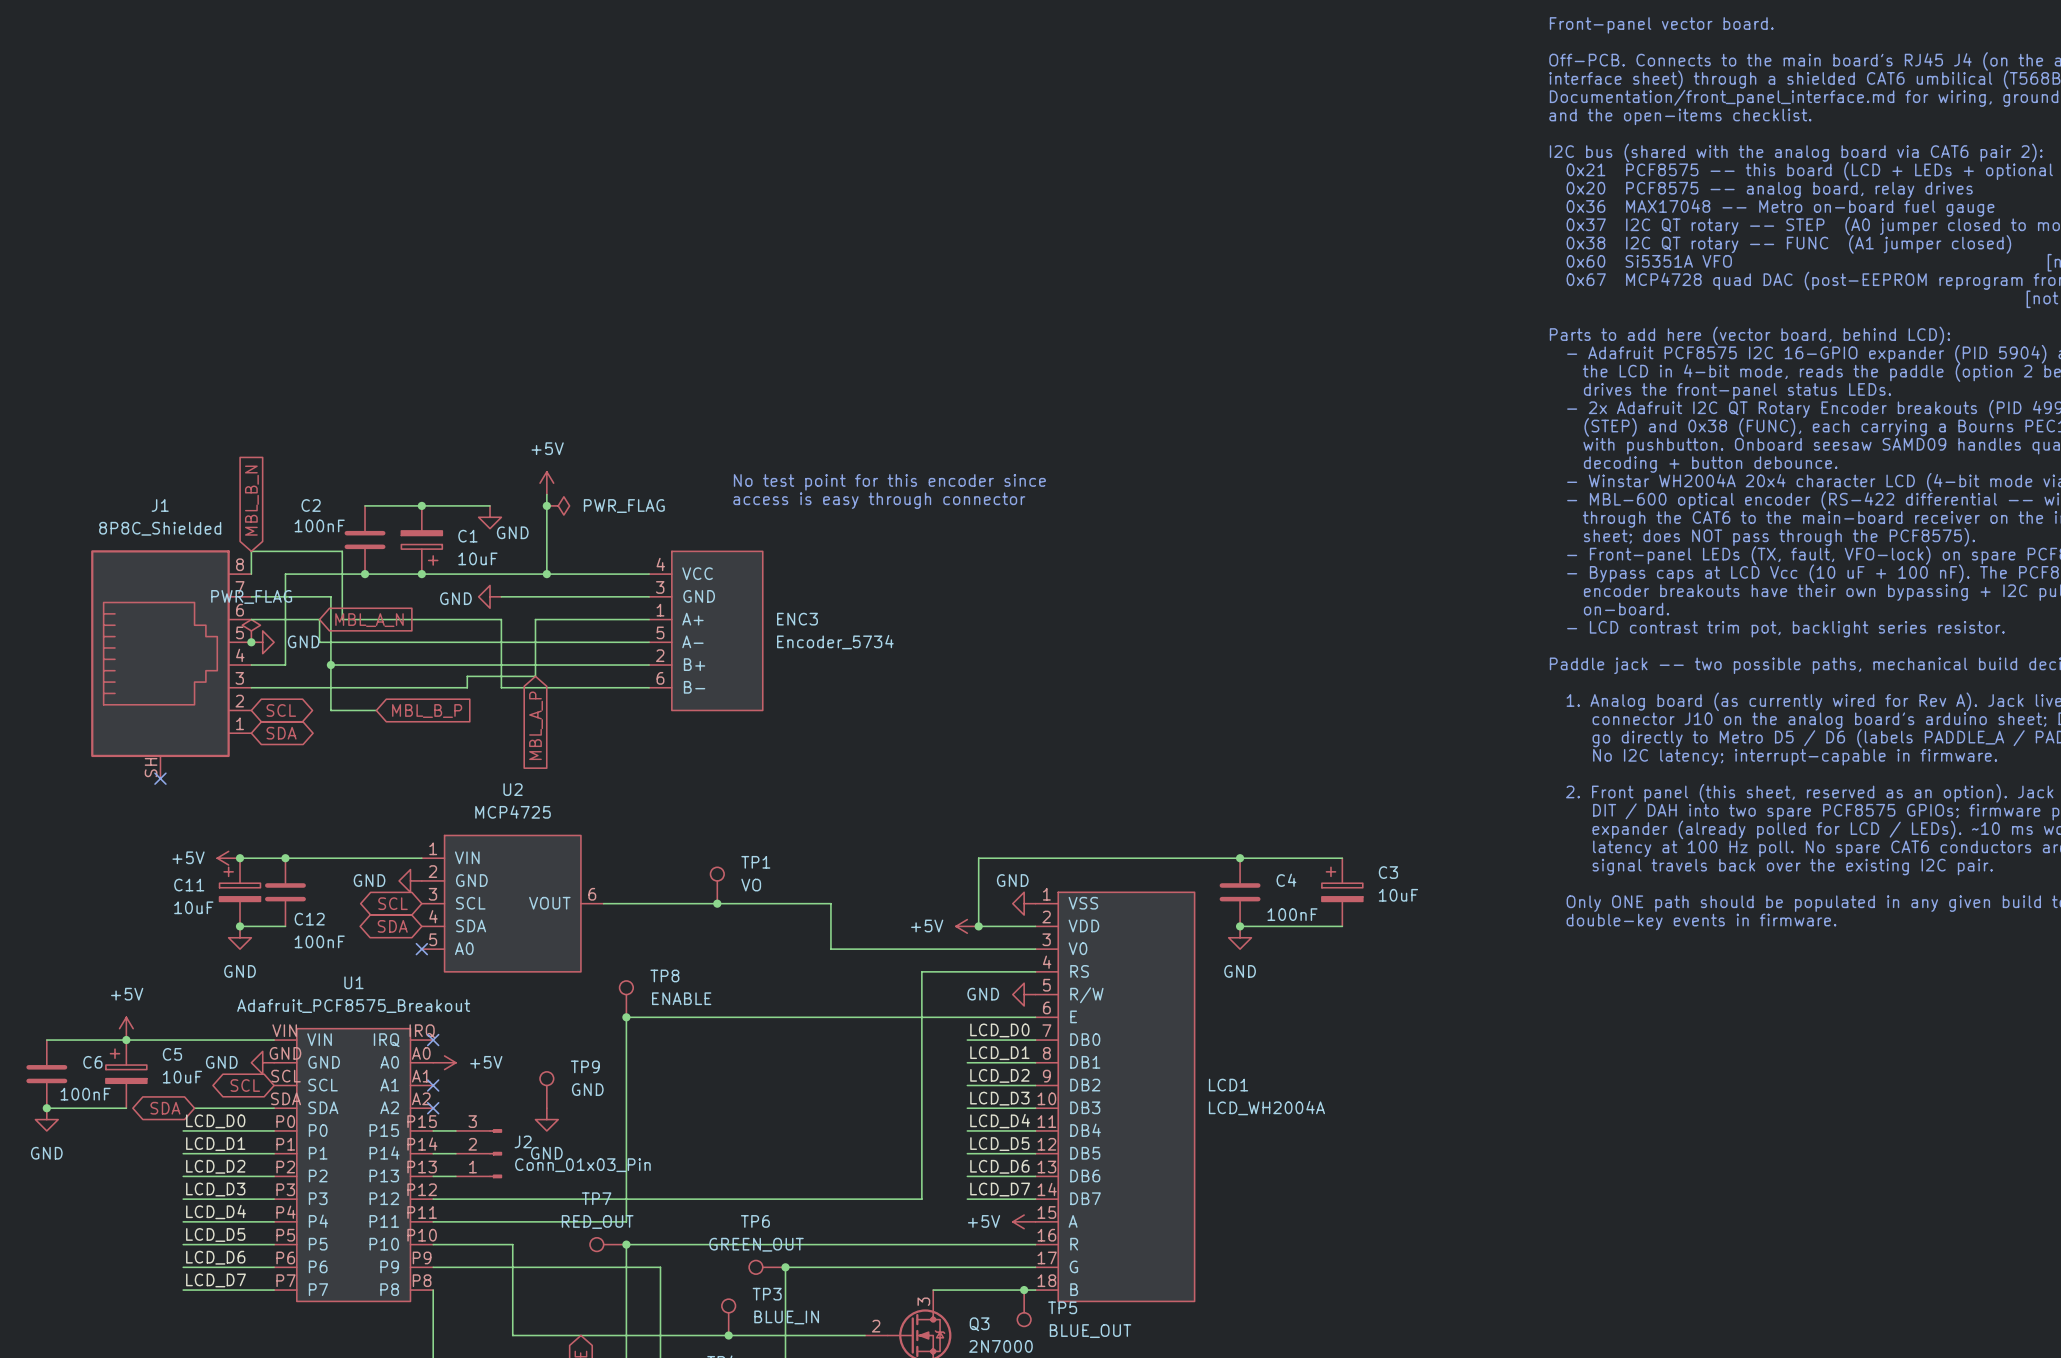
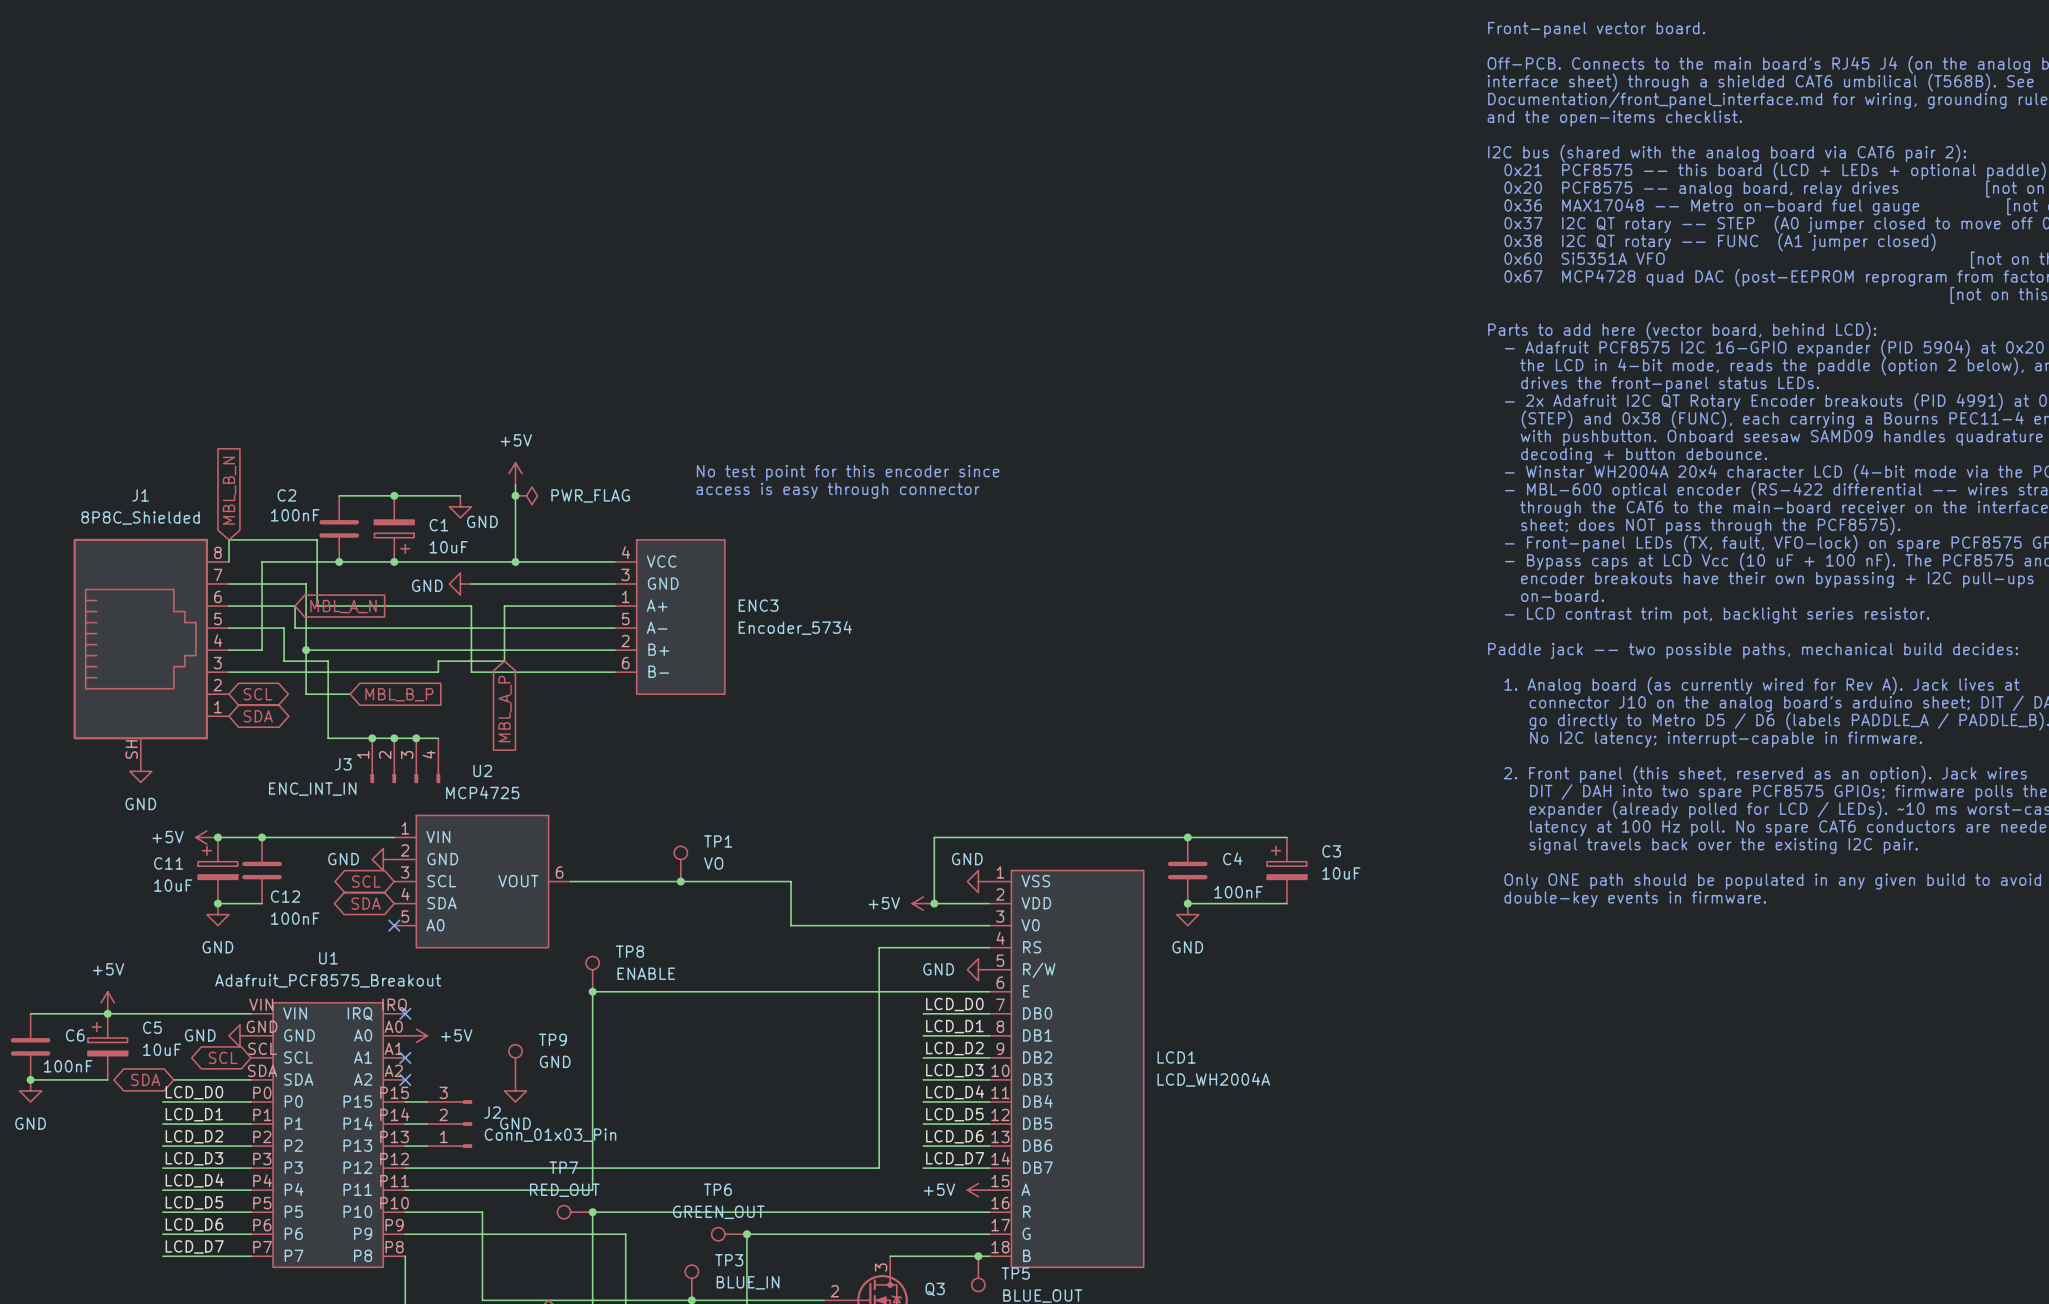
power symbol: PWR_FLAG (251, 630) -> none
wire: none -> (228, 628) (284, 628) (284, 661) (328, 661) (328, 738) (438, 738)
junction: (251, 642) -> none
power symbol rotation: 0° (262, 642) -> 90° clockwise (140, 771)
power symbol position: GND (262, 642) -> GND (140, 771)
junction: none -> (372, 738)
junction: none -> (394, 738)
junction: none -> (416, 738)
no-connect mark: (160, 778) -> none
J3: none -> ENC_INT_IN (405, 760)

